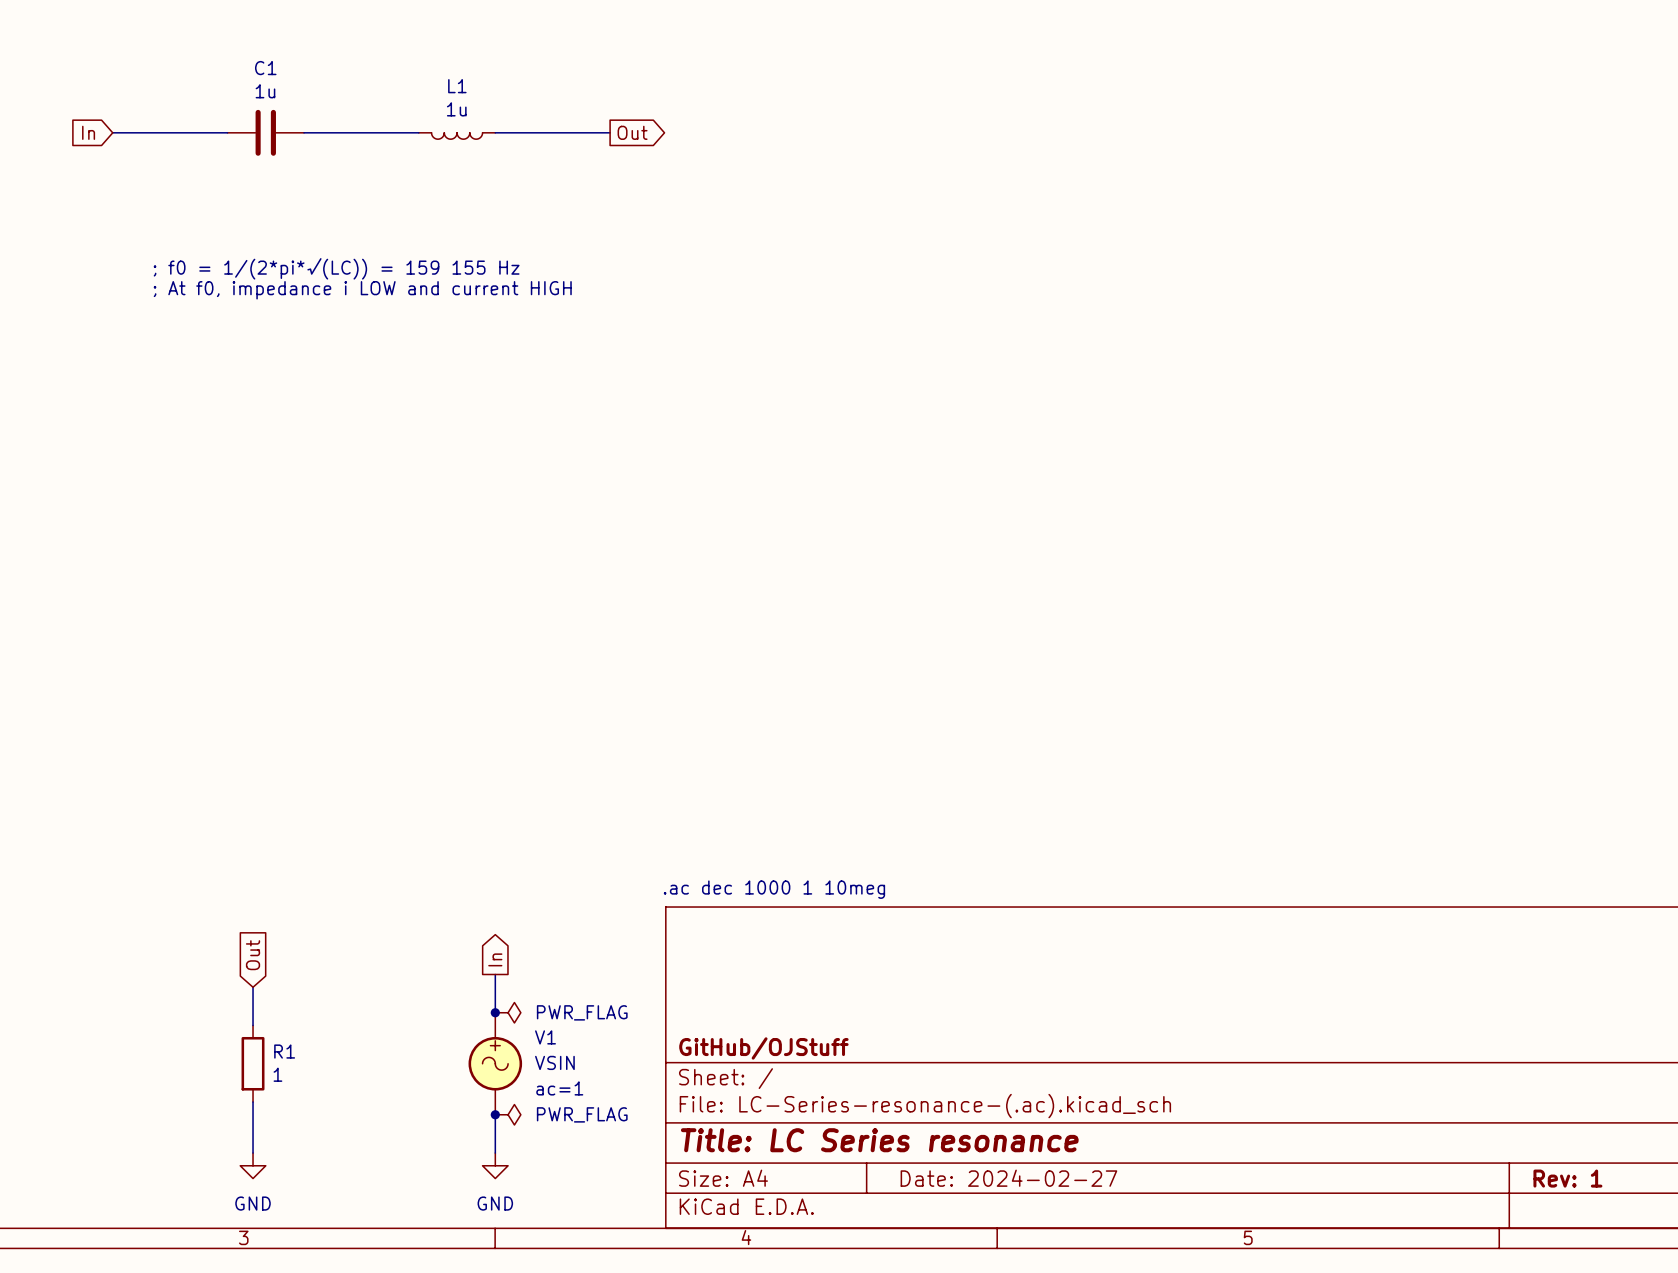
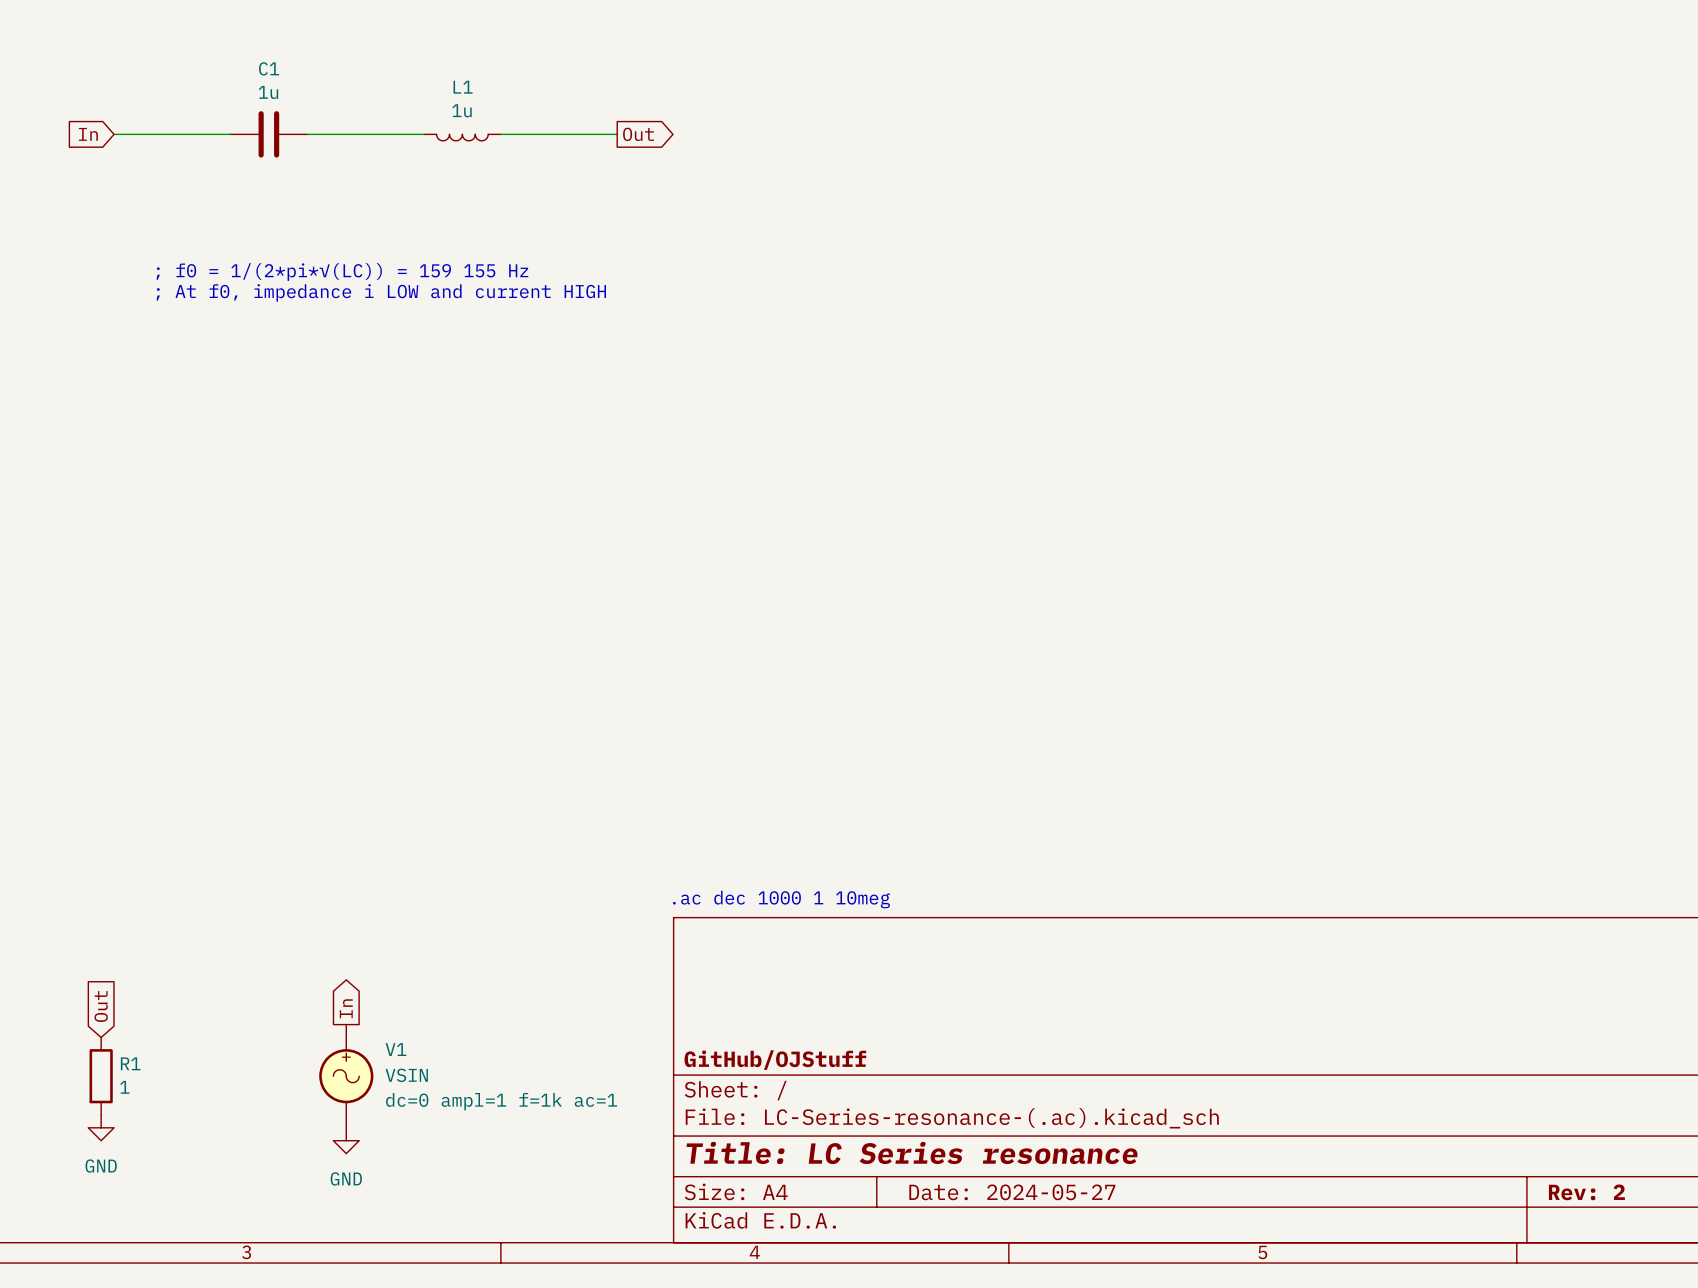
global label position: Out (253, 955) -> Out (101, 1006)
global label position: In (495, 959) -> In (346, 1008)
wire: (495, 974) (495, 1012) -> none
wire: (253, 987) (253, 1025) -> none
junction: (495, 1012) -> none
power symbol: PWR_FLAG (508, 1012) -> none
R1 position: (253, 1063) -> (101, 1076)
V1 position: (495, 1063) -> (346, 1076)
V1 text: ac=1 (559, 1088) -> dc=0 ampl=1 f=1k ac=1 (501, 1101)
wire: (253, 1102) (253, 1153) -> none
power symbol: none -> GND (101, 1127)
wire: (495, 1114) (495, 1153) -> none
junction: (495, 1114) -> none
power symbol: PWR_FLAG (508, 1114) -> none
power symbol: none -> GND (346, 1140)
power symbol: GND (253, 1165) -> none
power symbol: GND (495, 1165) -> none
title block: Date: 2024-02-27 (1008, 1178) -> Date: 2024-05-27 (1012, 1192)
title block: Rev: 1 (1567, 1178) -> Rev: 2 (1586, 1192)

